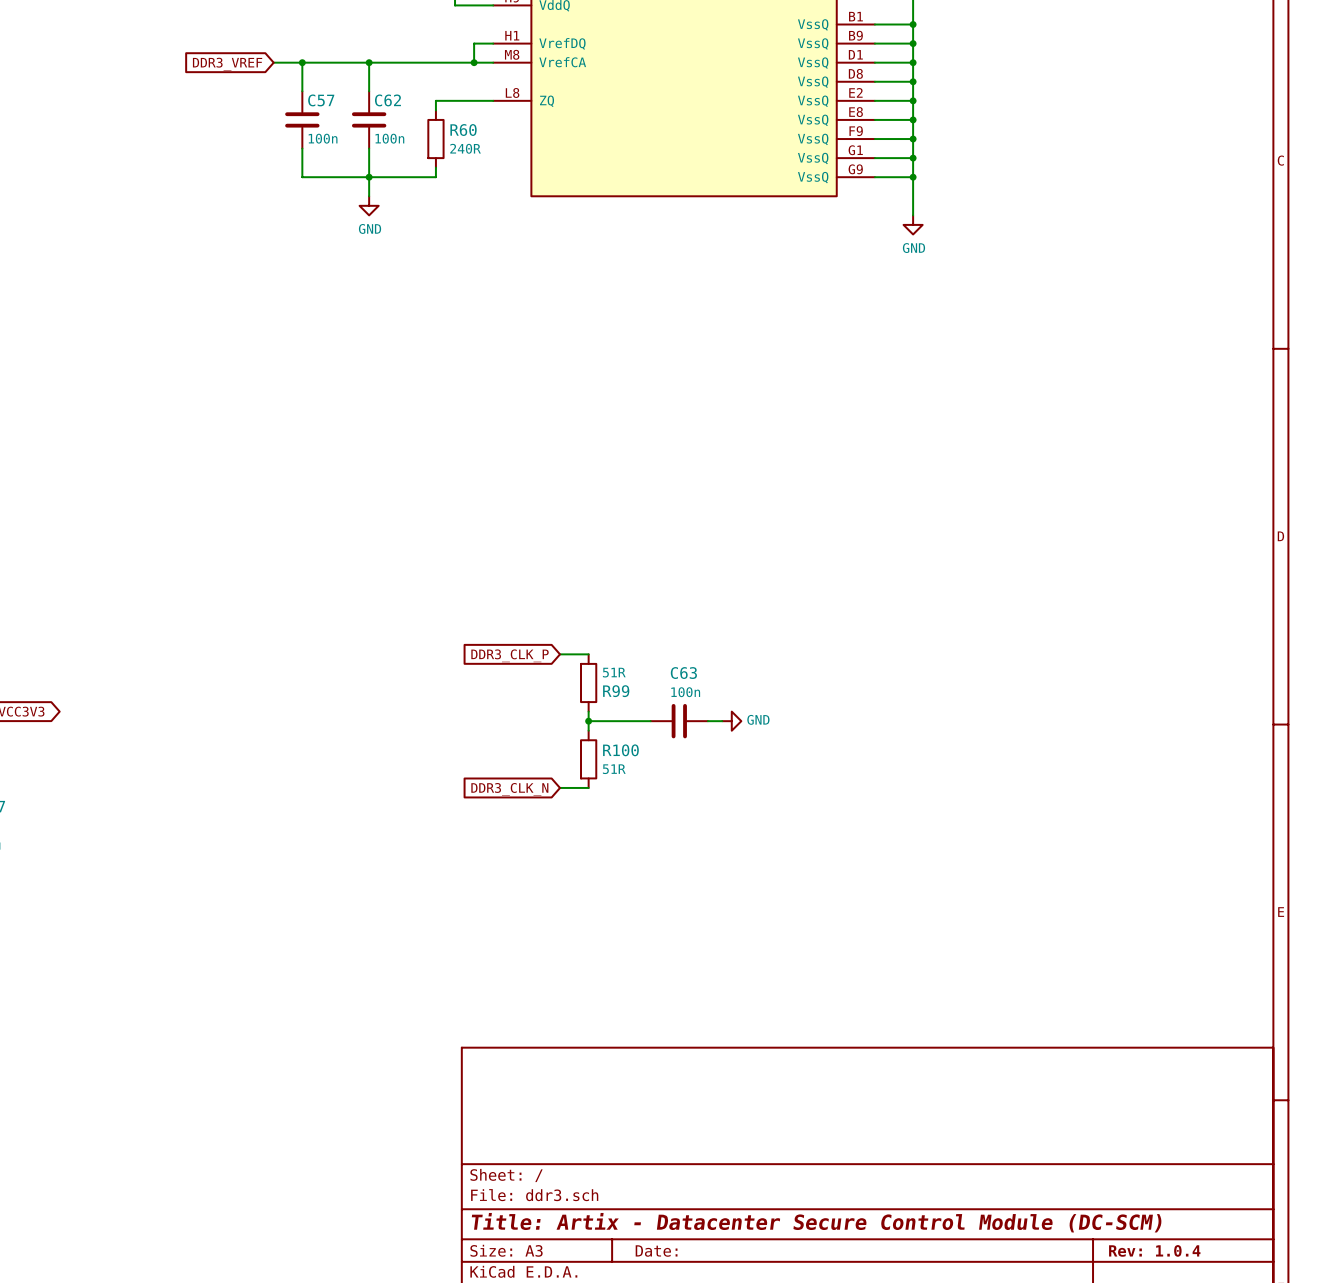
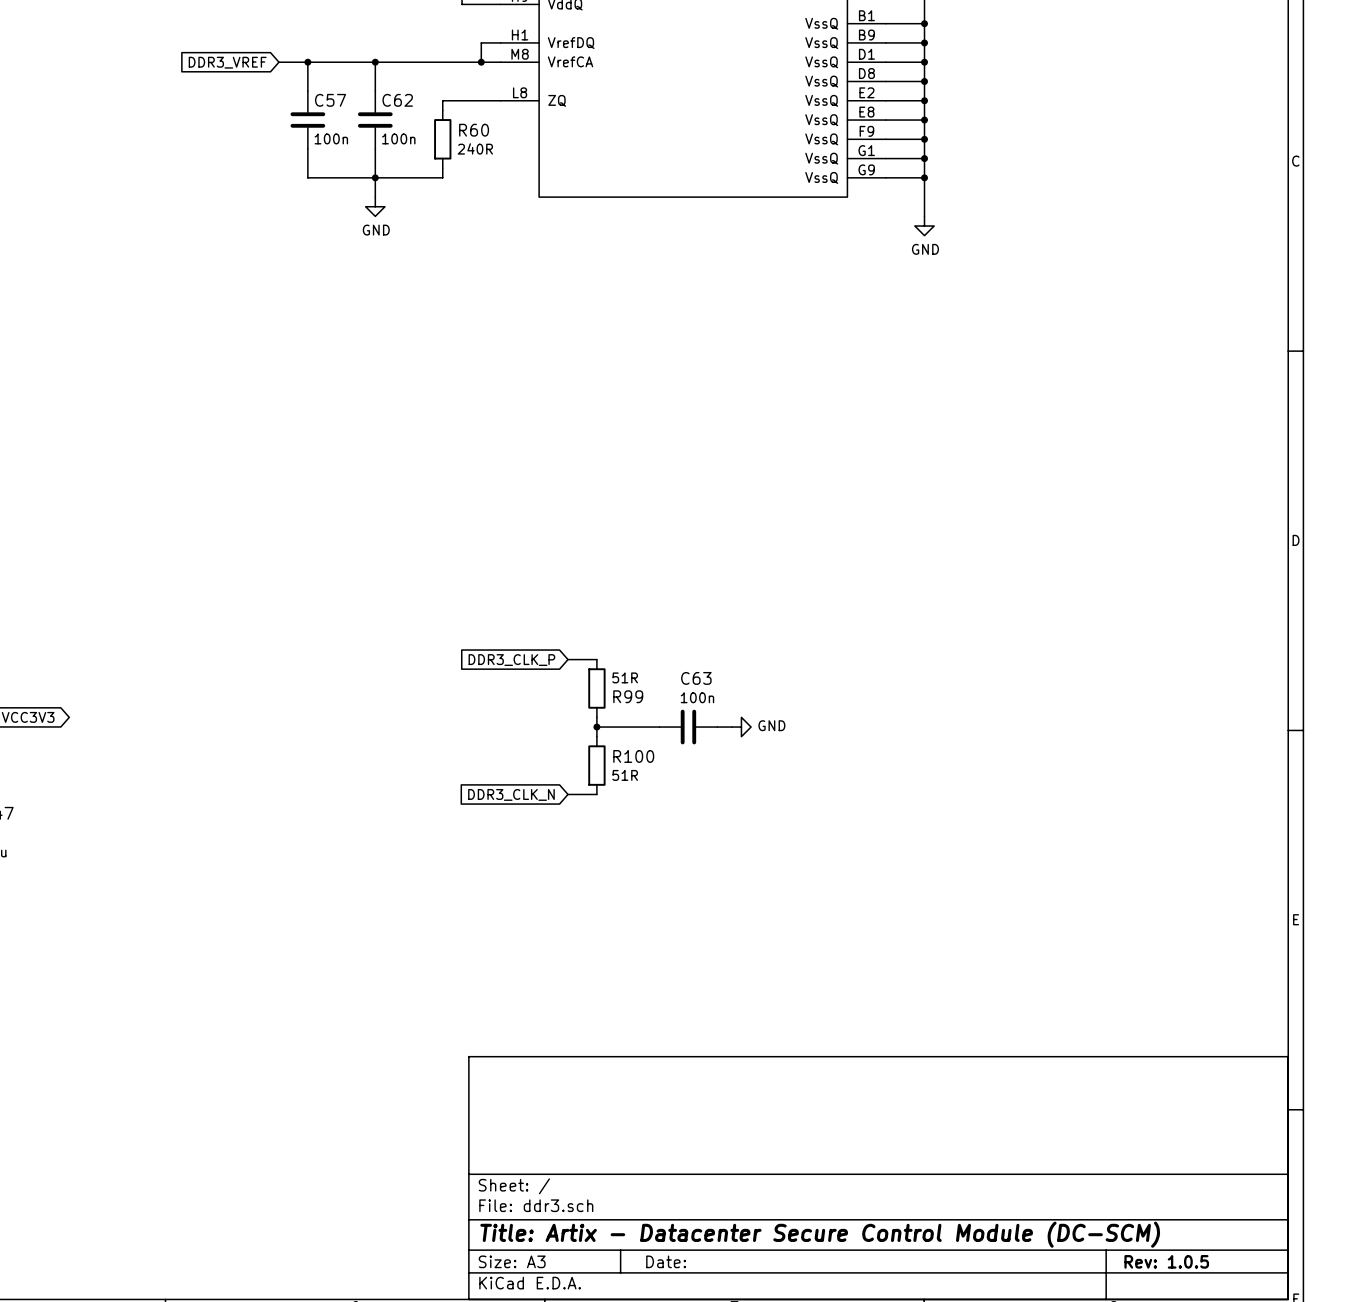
title block: Rev: 1.0.4 (1154, 1250) -> Rev: 1.0.5 (1166, 1261)

